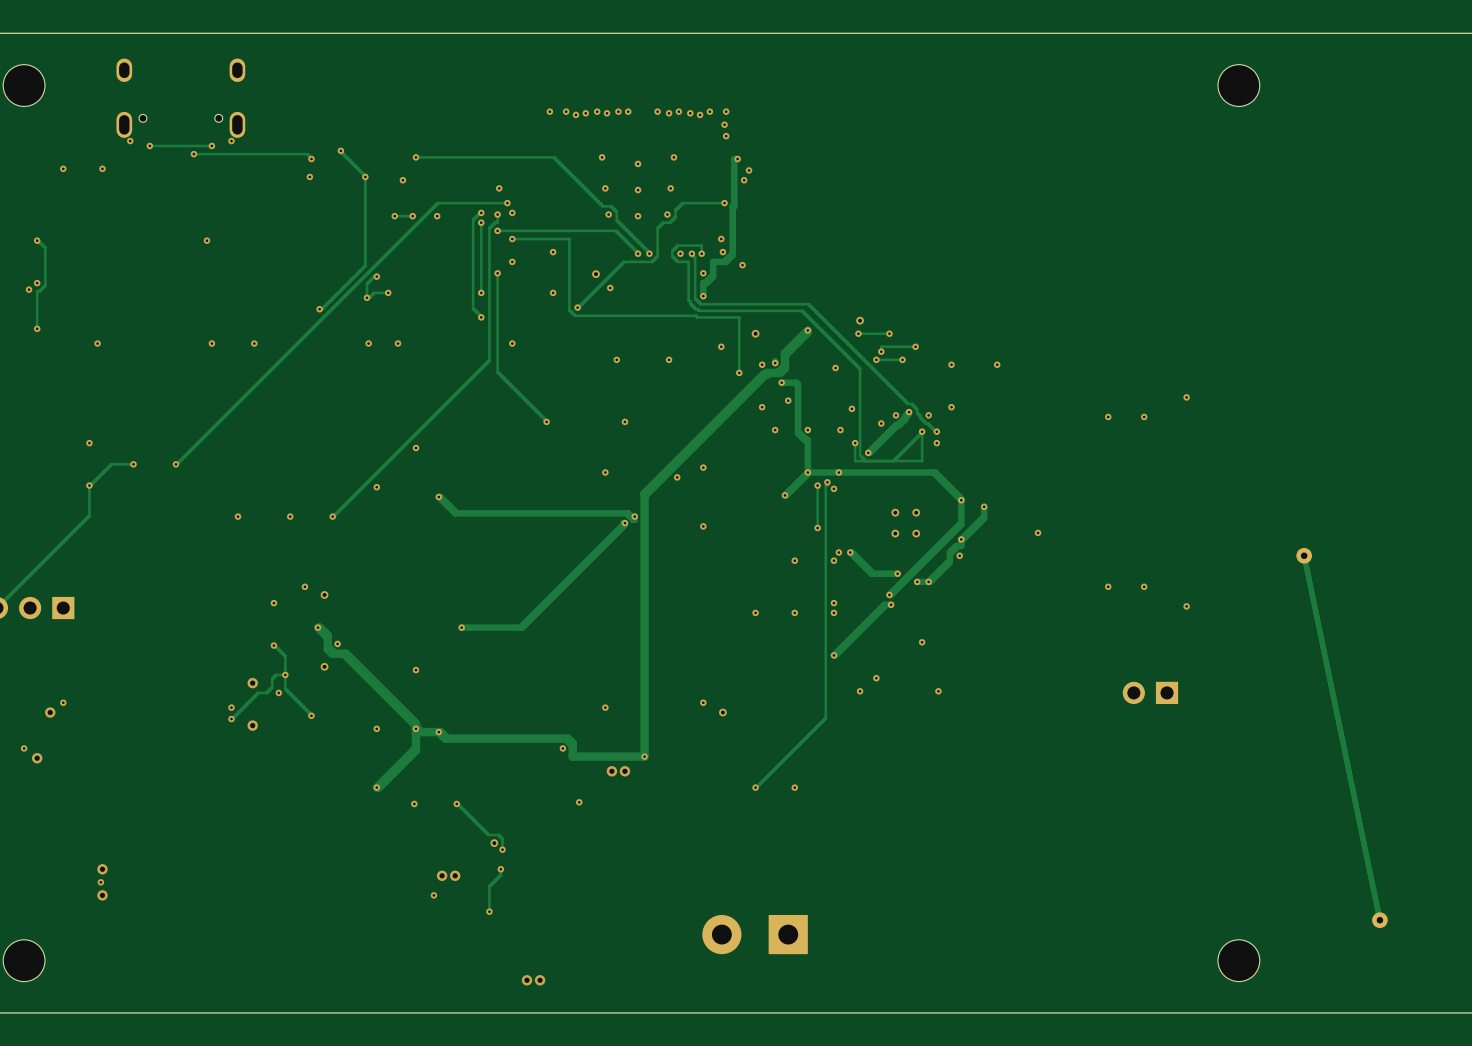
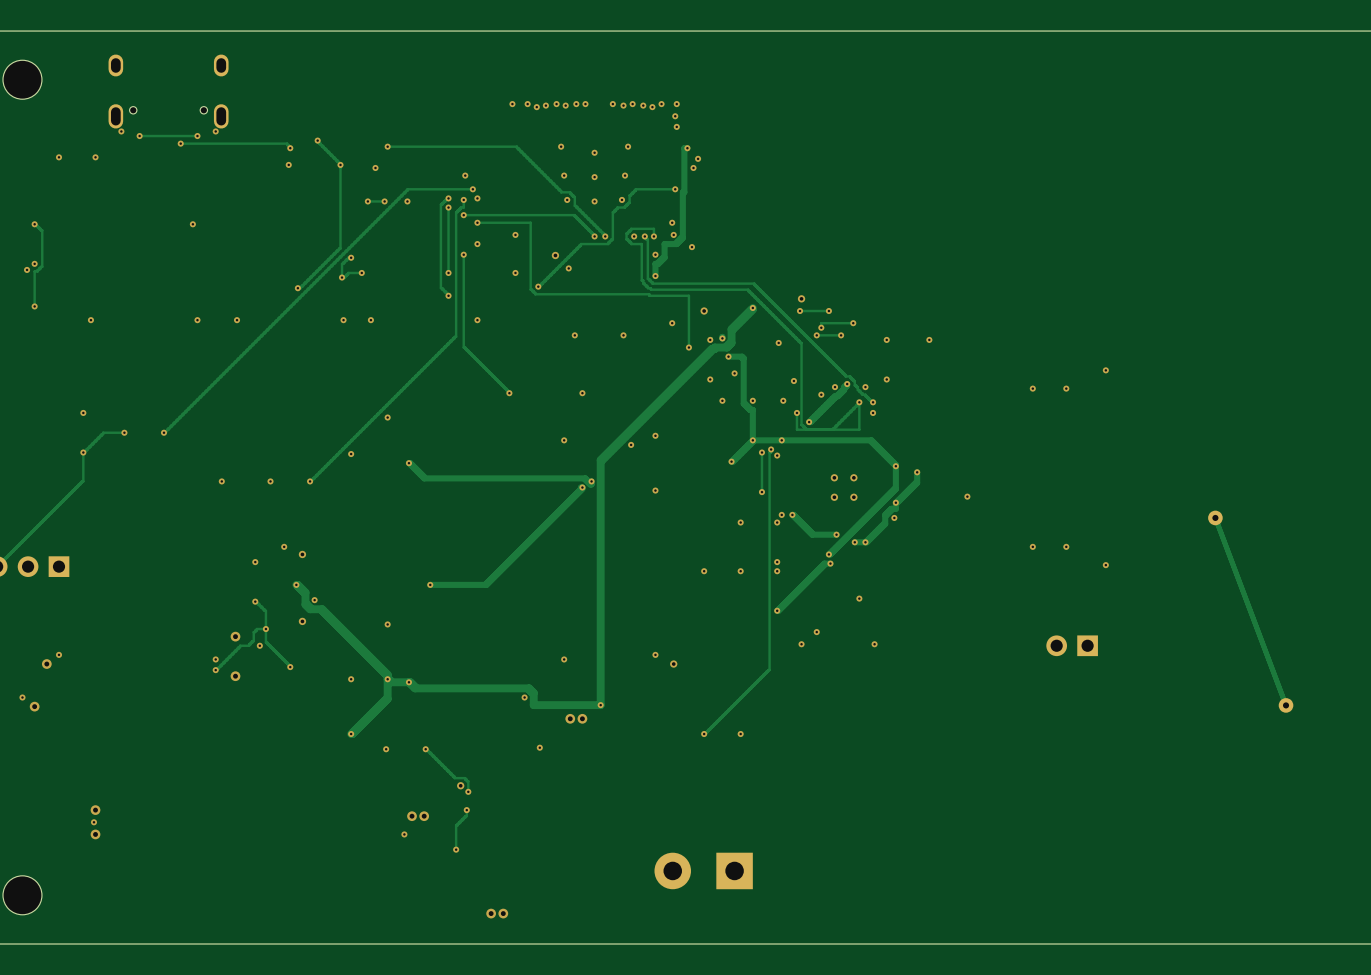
part: (1238, 85) -> none
track: (1304, 555) (1379, 920) -> (1215, 517) (1286, 705)
part: none -> (1250, 611)
part: (1342, 737) -> none
part: (1238, 960) -> none

